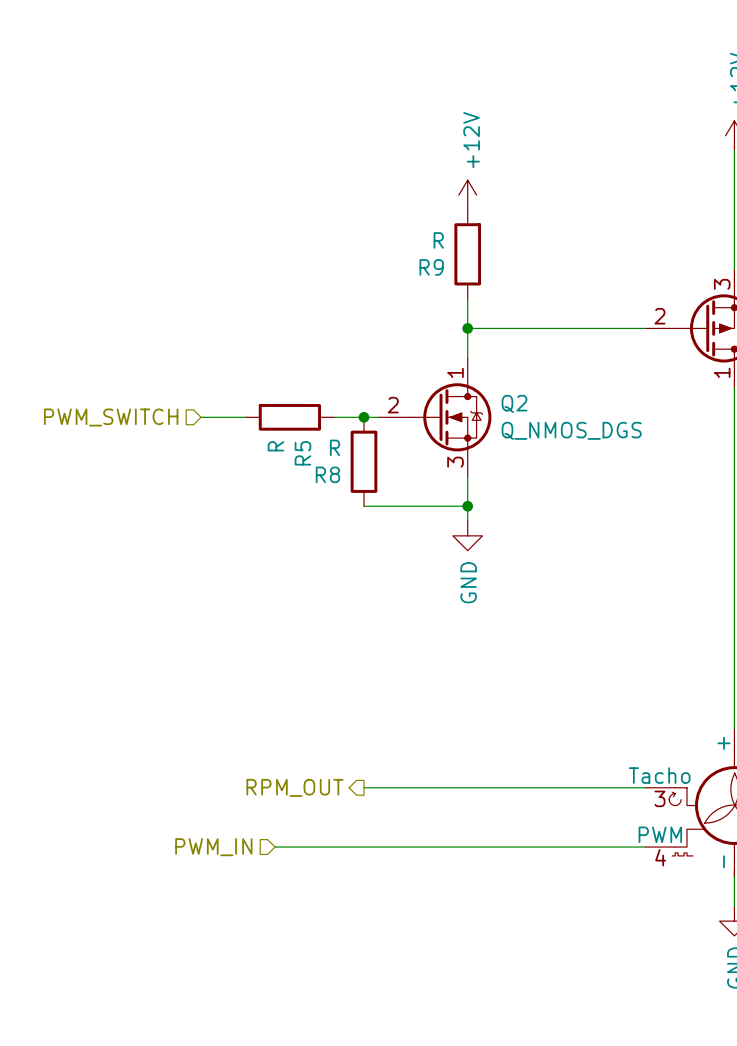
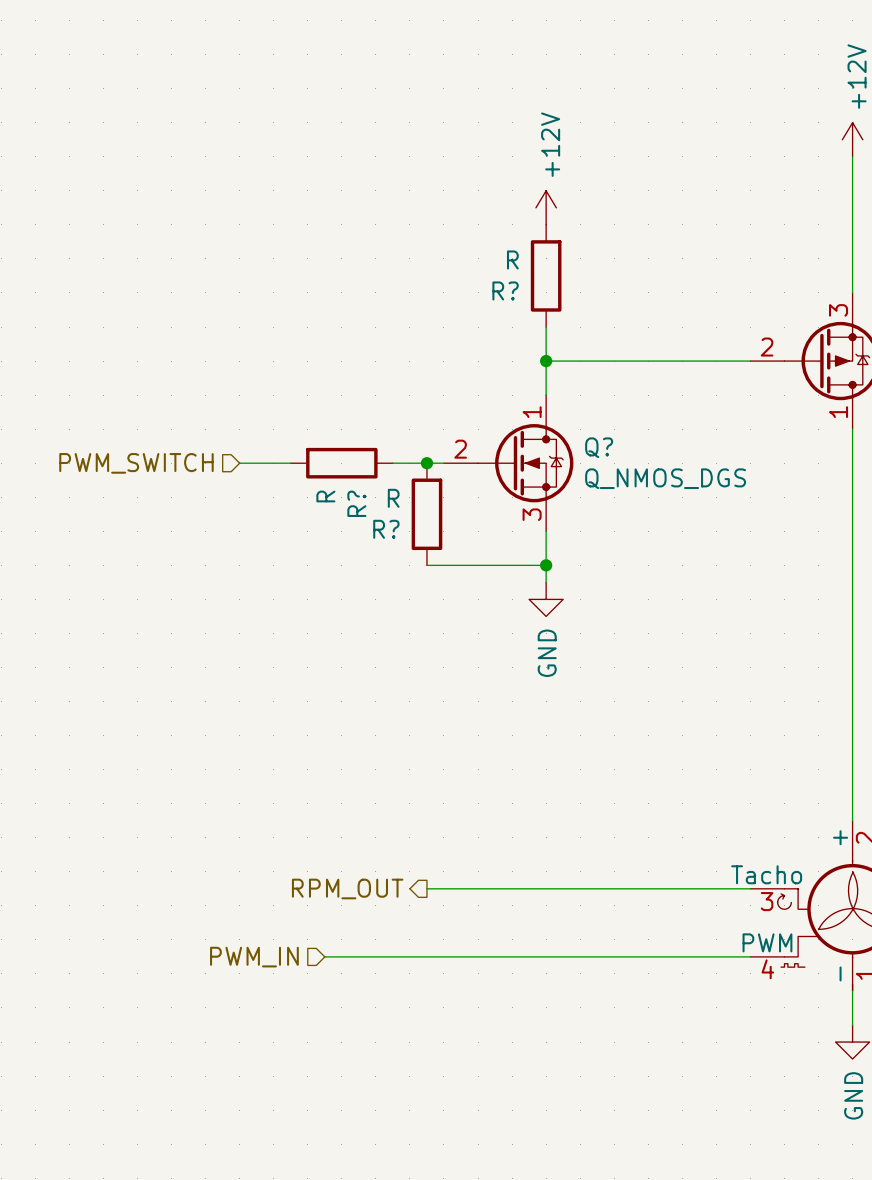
R9 name: R9 (431, 267) -> R? (505, 290)
Q2 name: Q2 (514, 403) -> Q? (599, 447)
R5 name: R5 (302, 453) -> R? (356, 503)
R8 name: R8 (327, 474) -> R? (386, 529)

